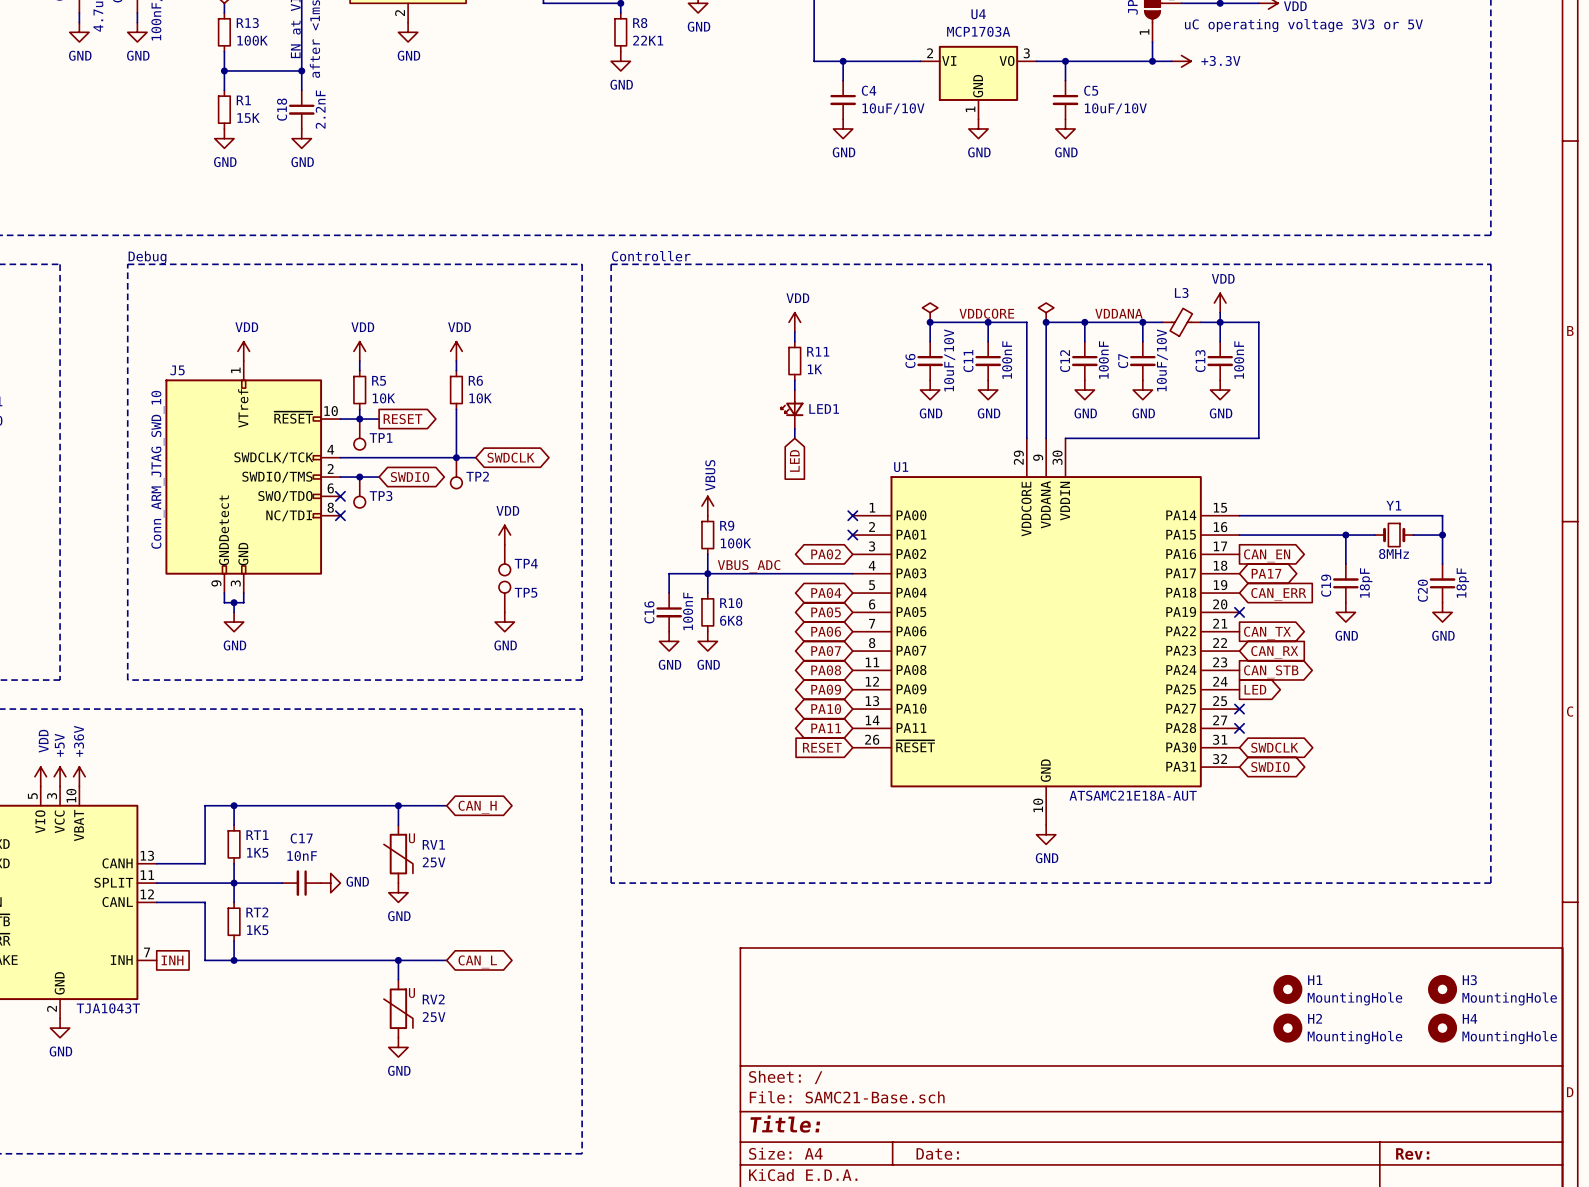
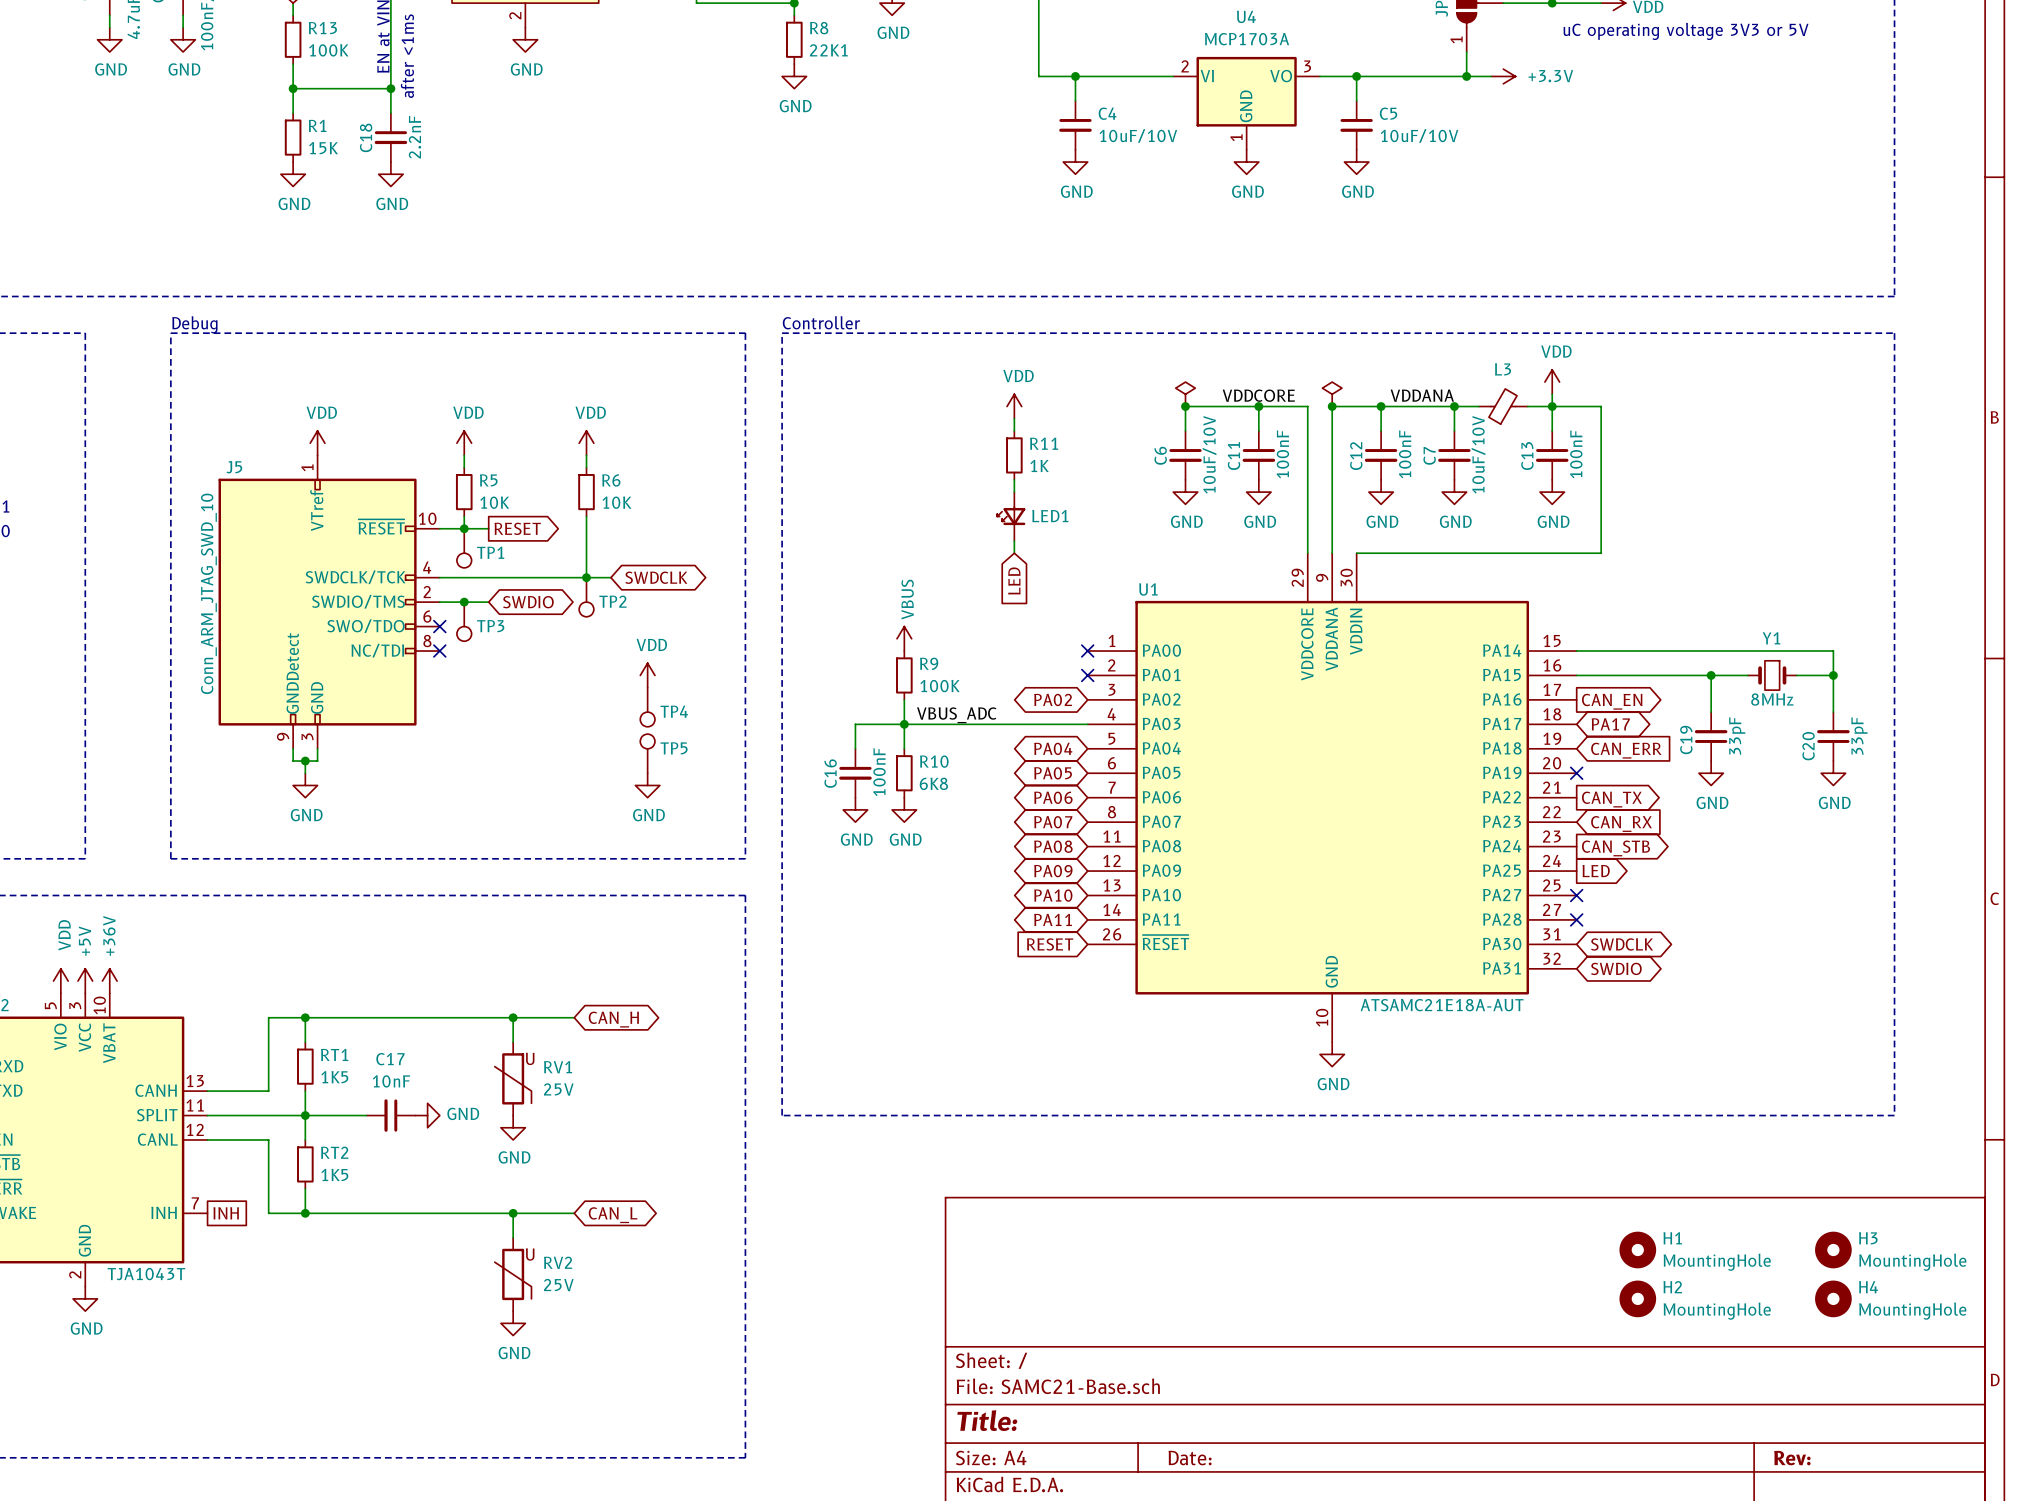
C19 value: 18pF (1366, 582) -> 33pF (1737, 735)
C20 value: 18pF (1462, 582) -> 33pF (1859, 735)

